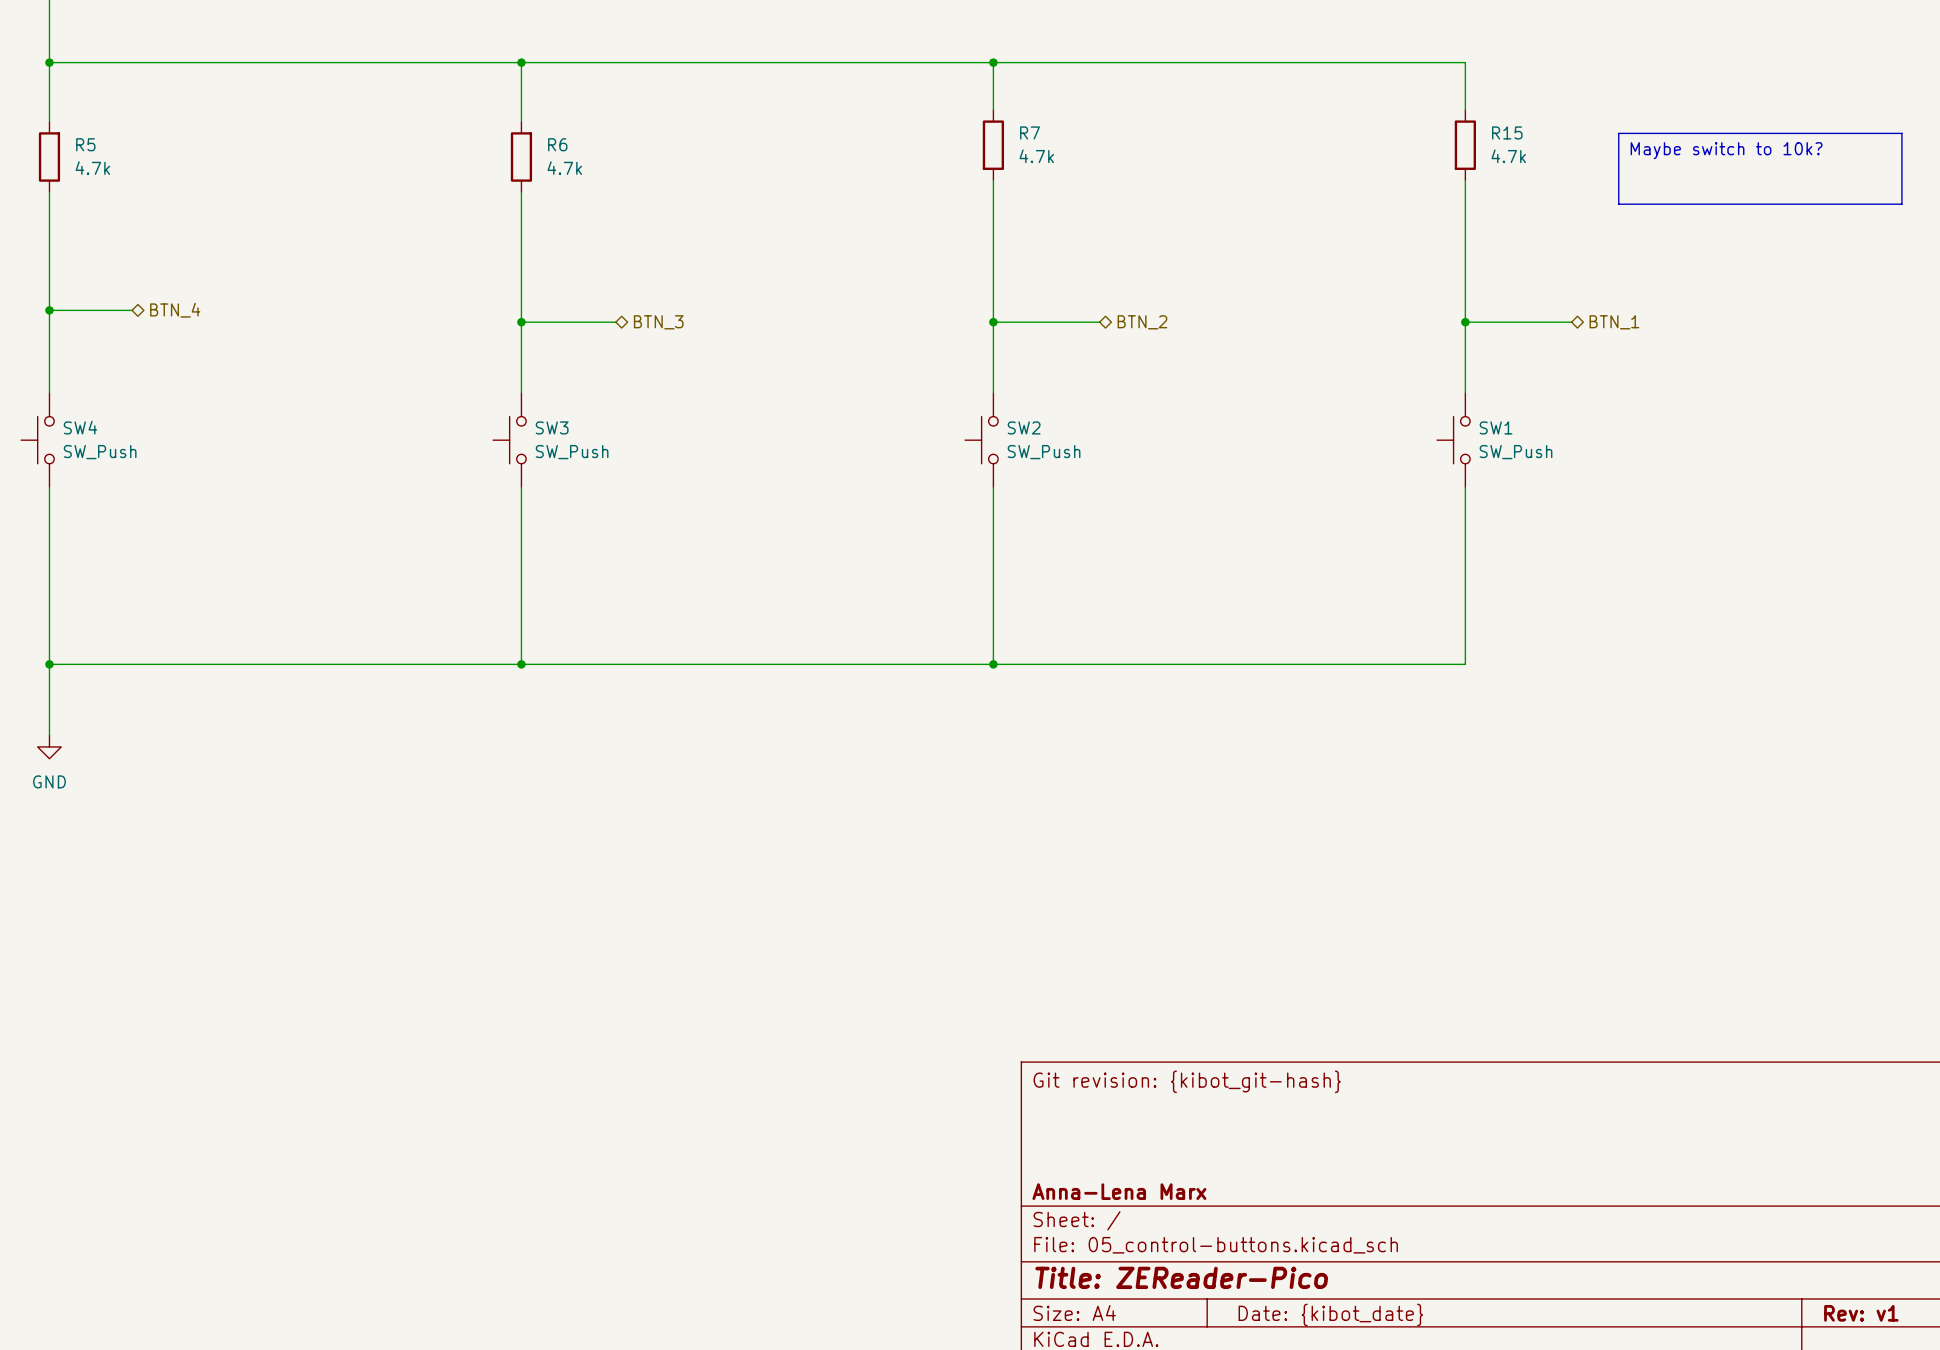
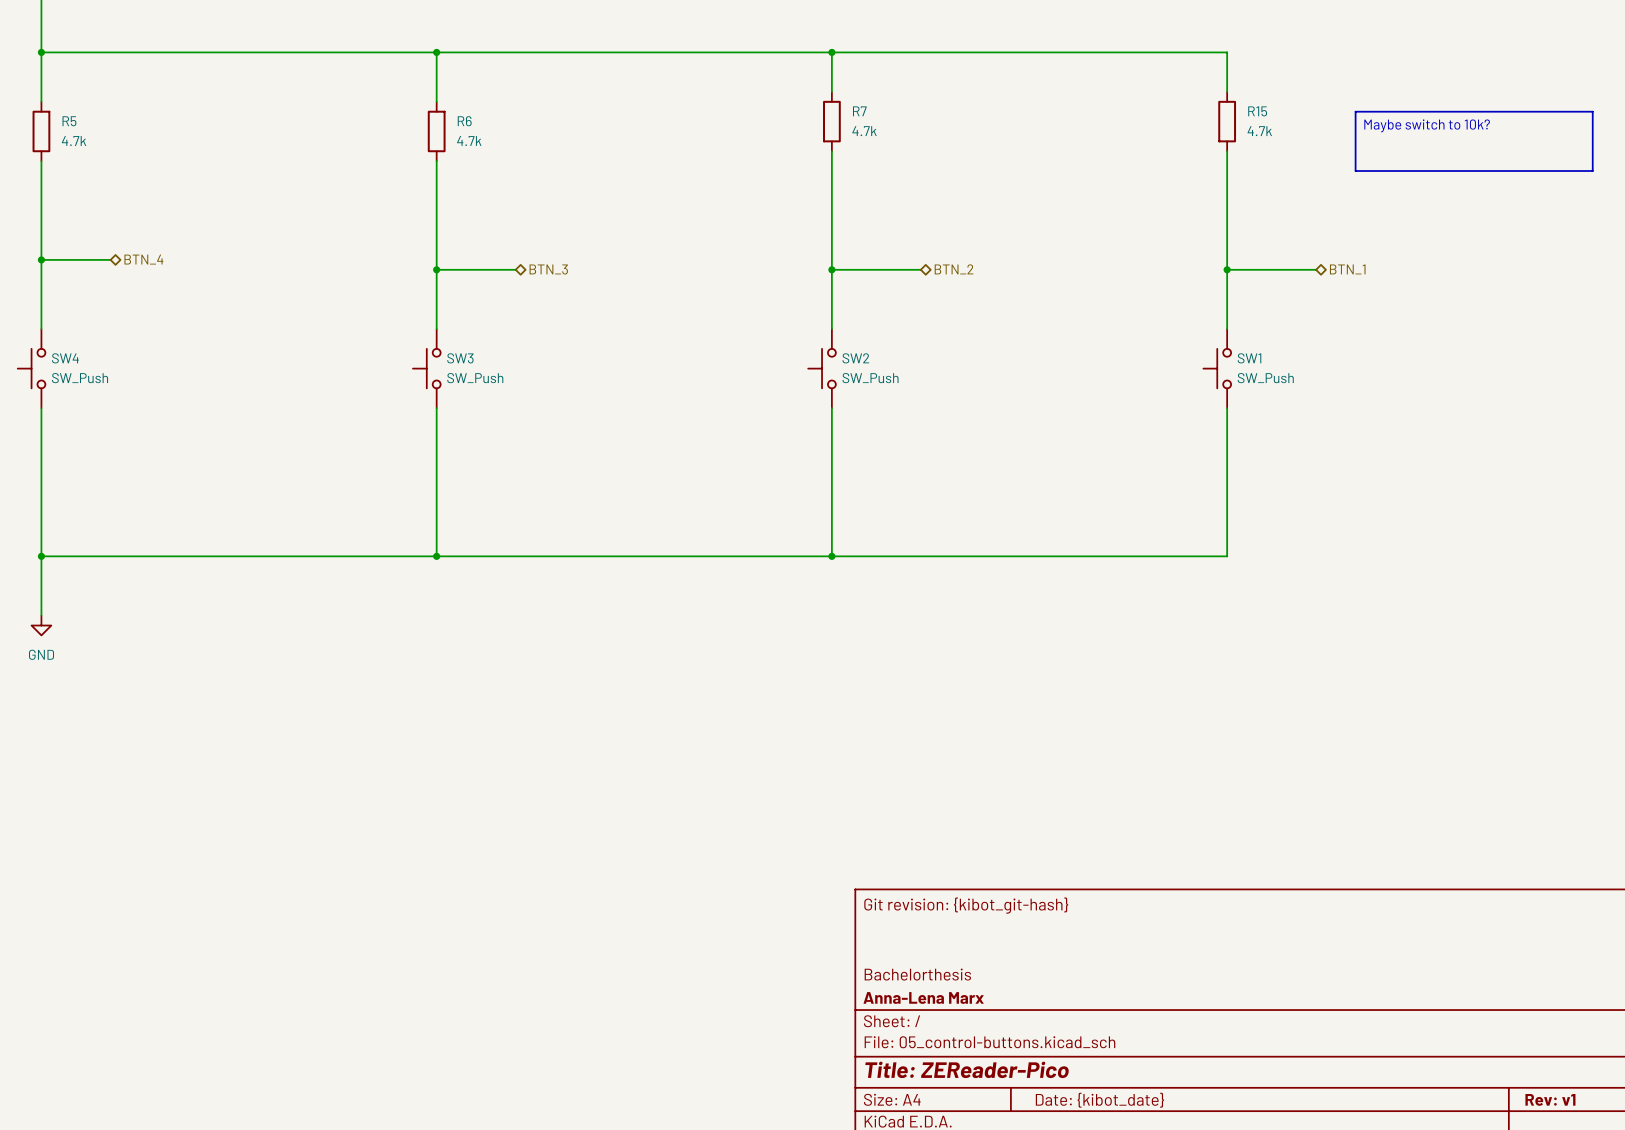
title block: none -> Bachelorthesis (917, 974)

